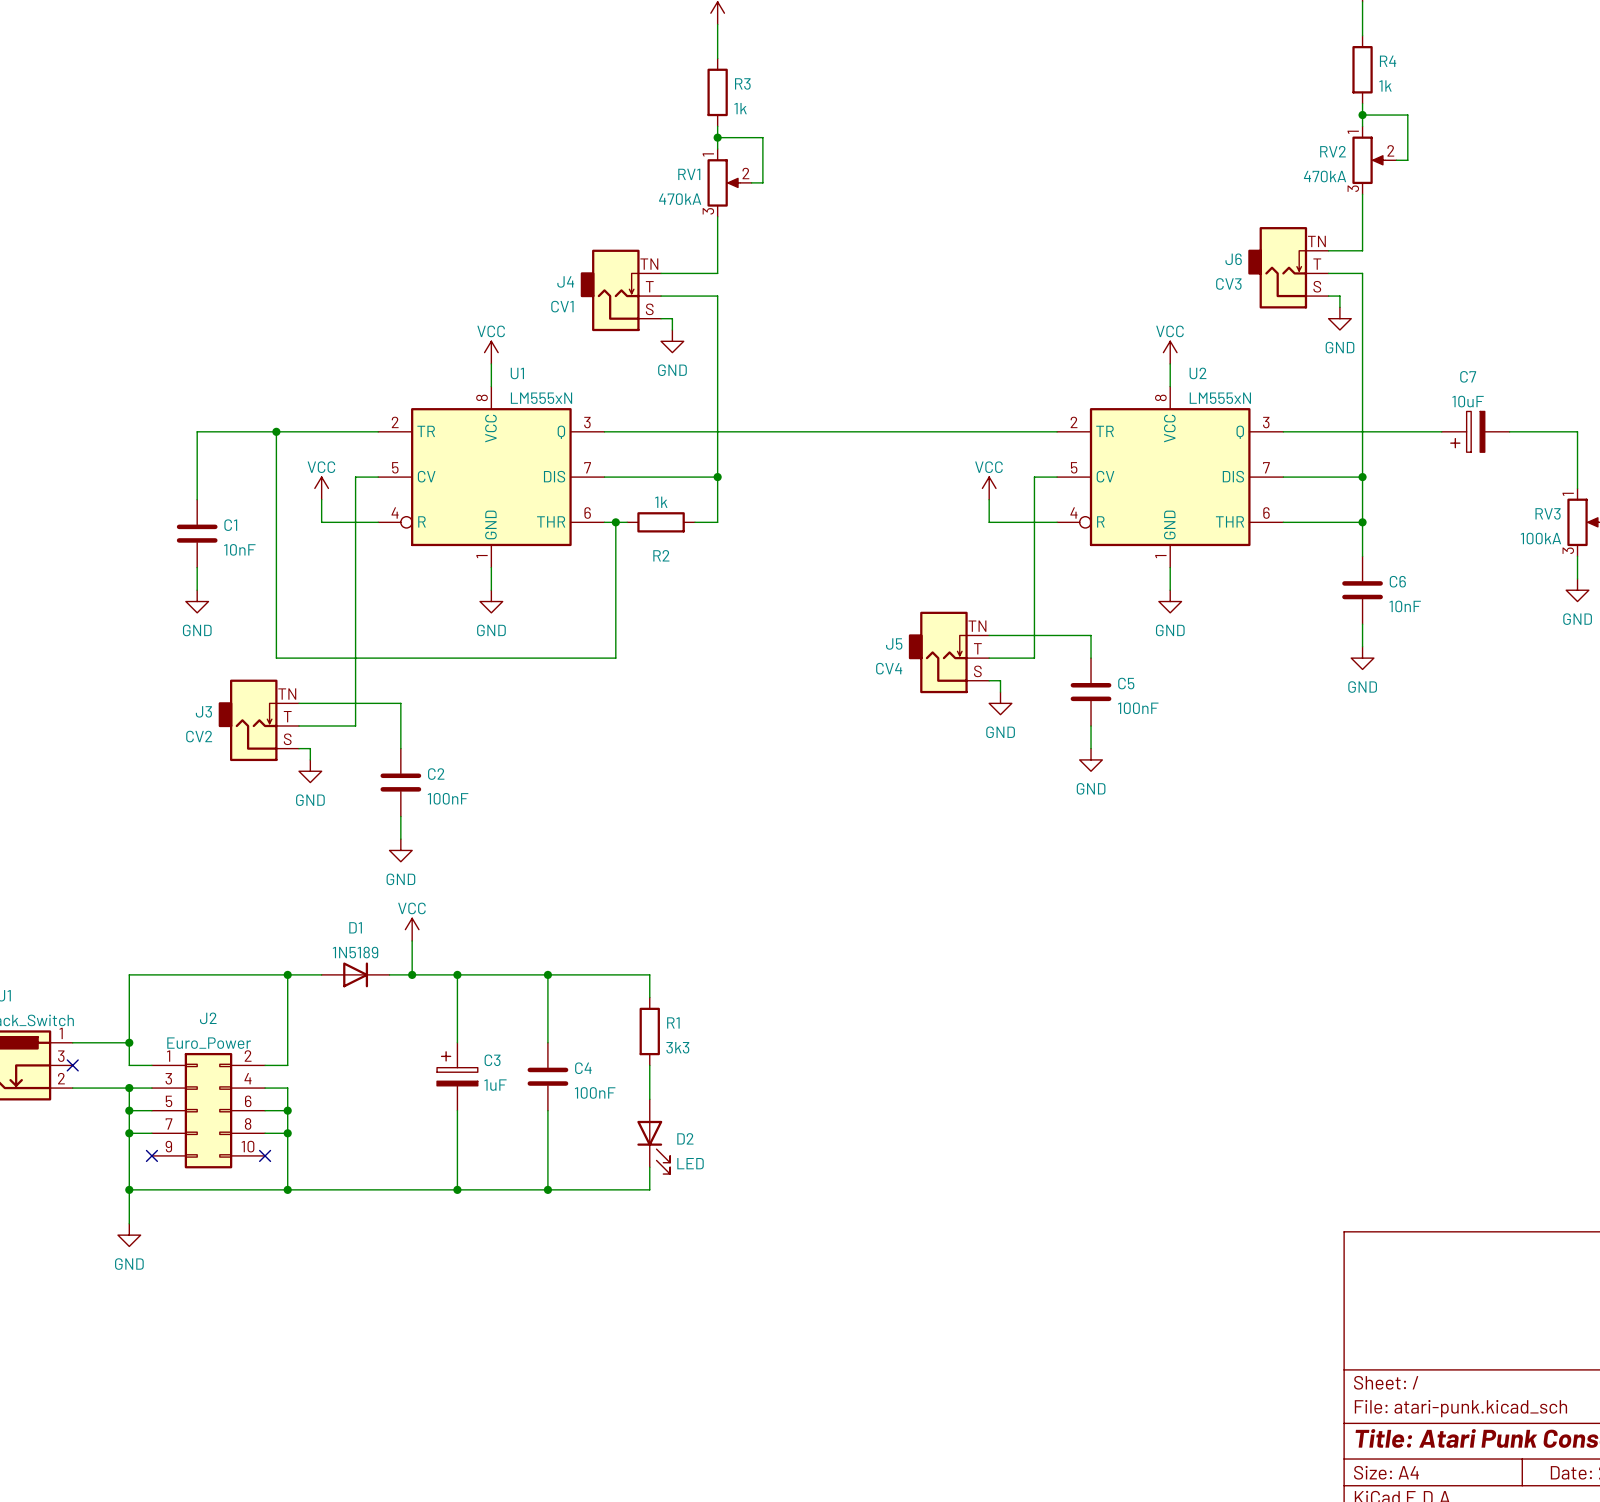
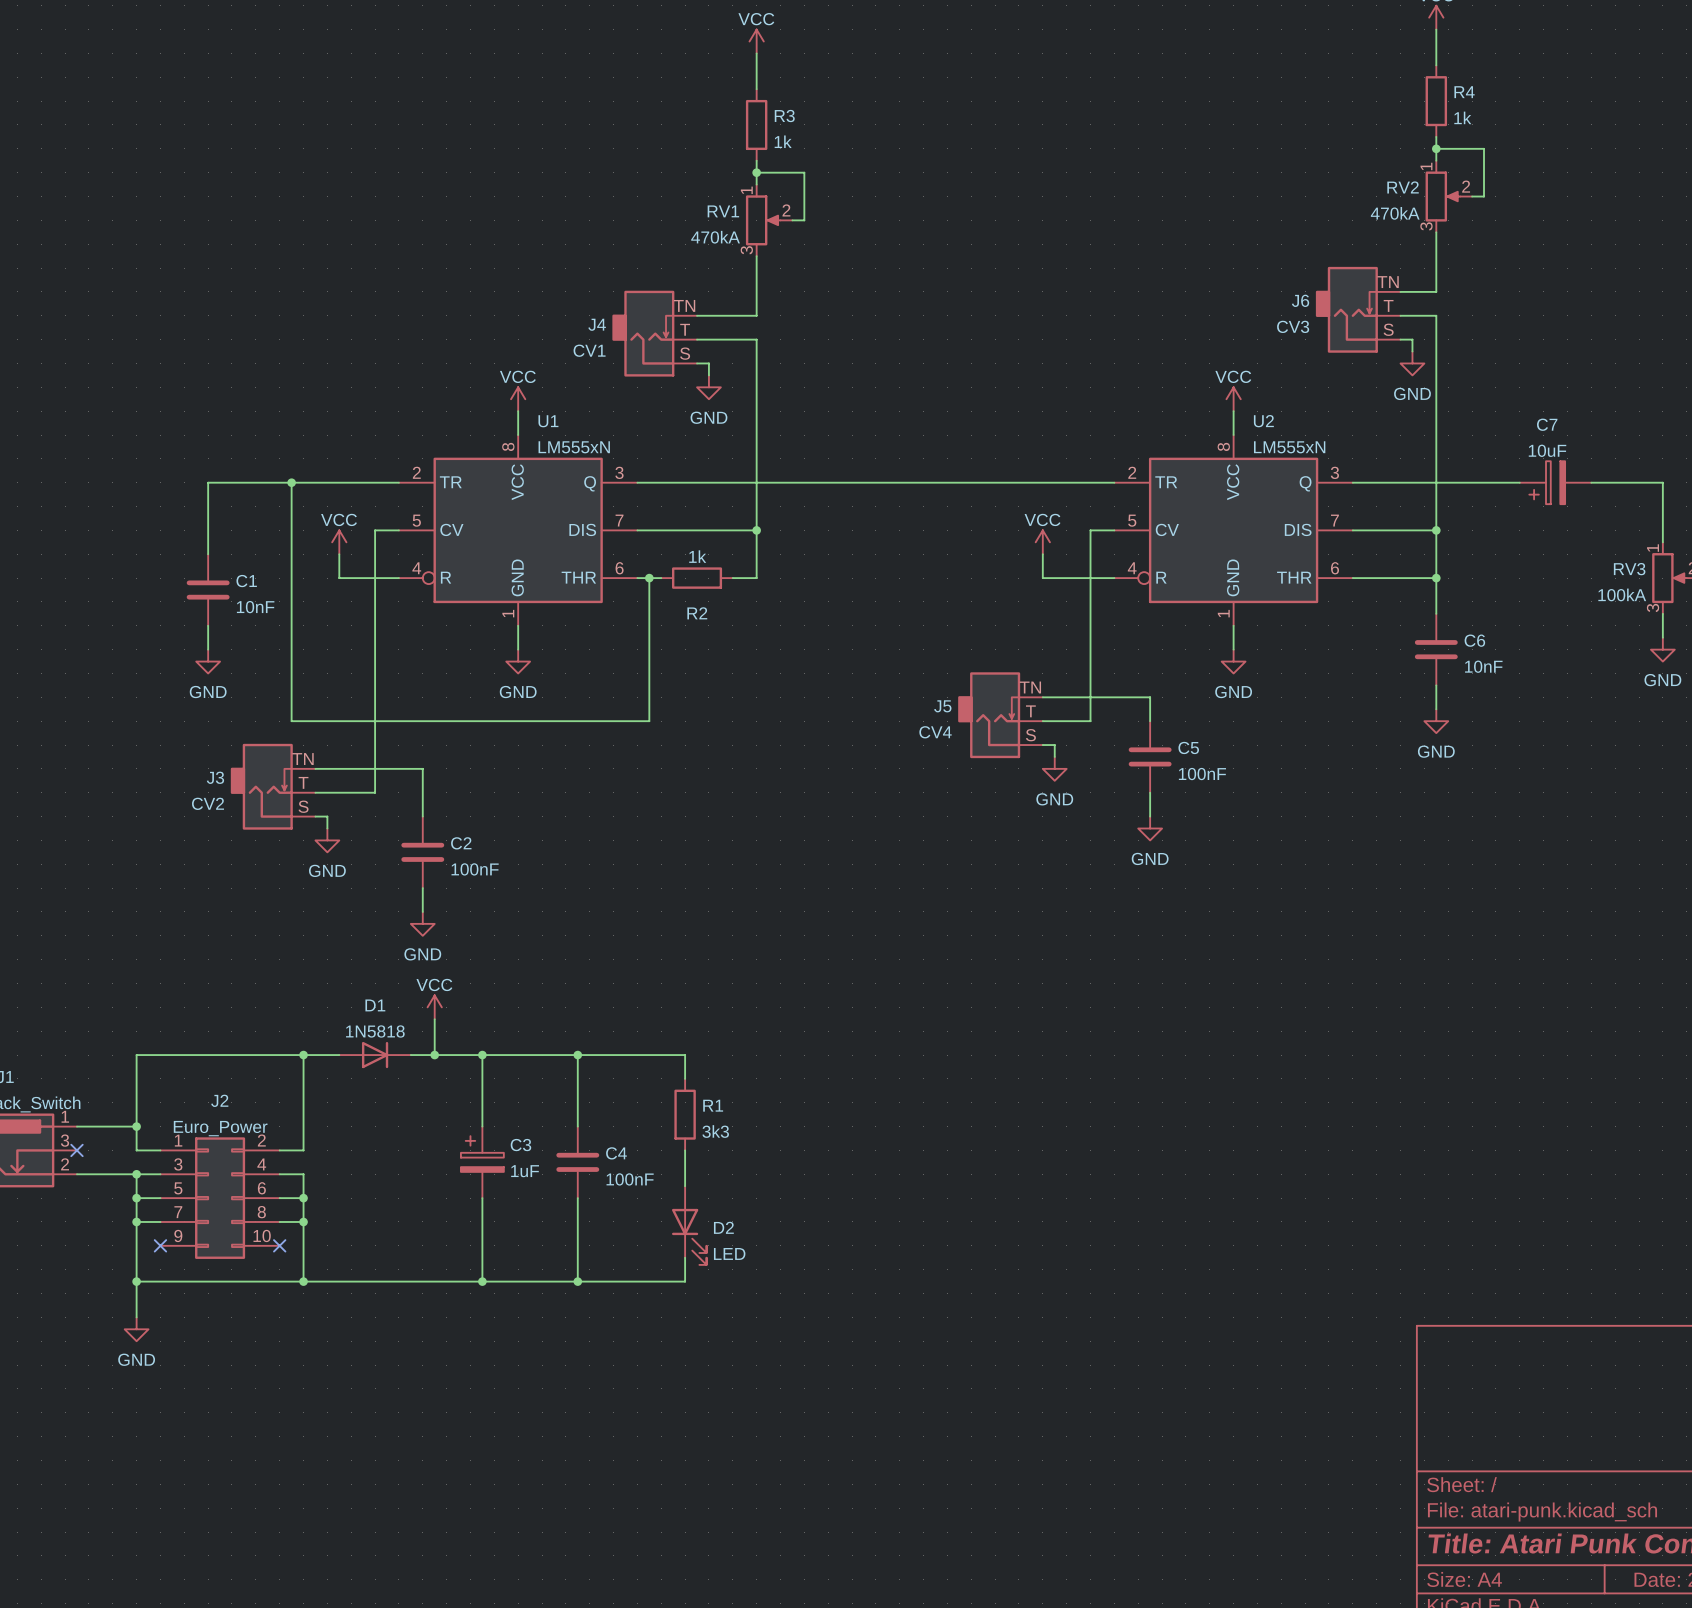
D1 value: 1N5189 (355, 952) -> 1N5818 (375, 1031)

